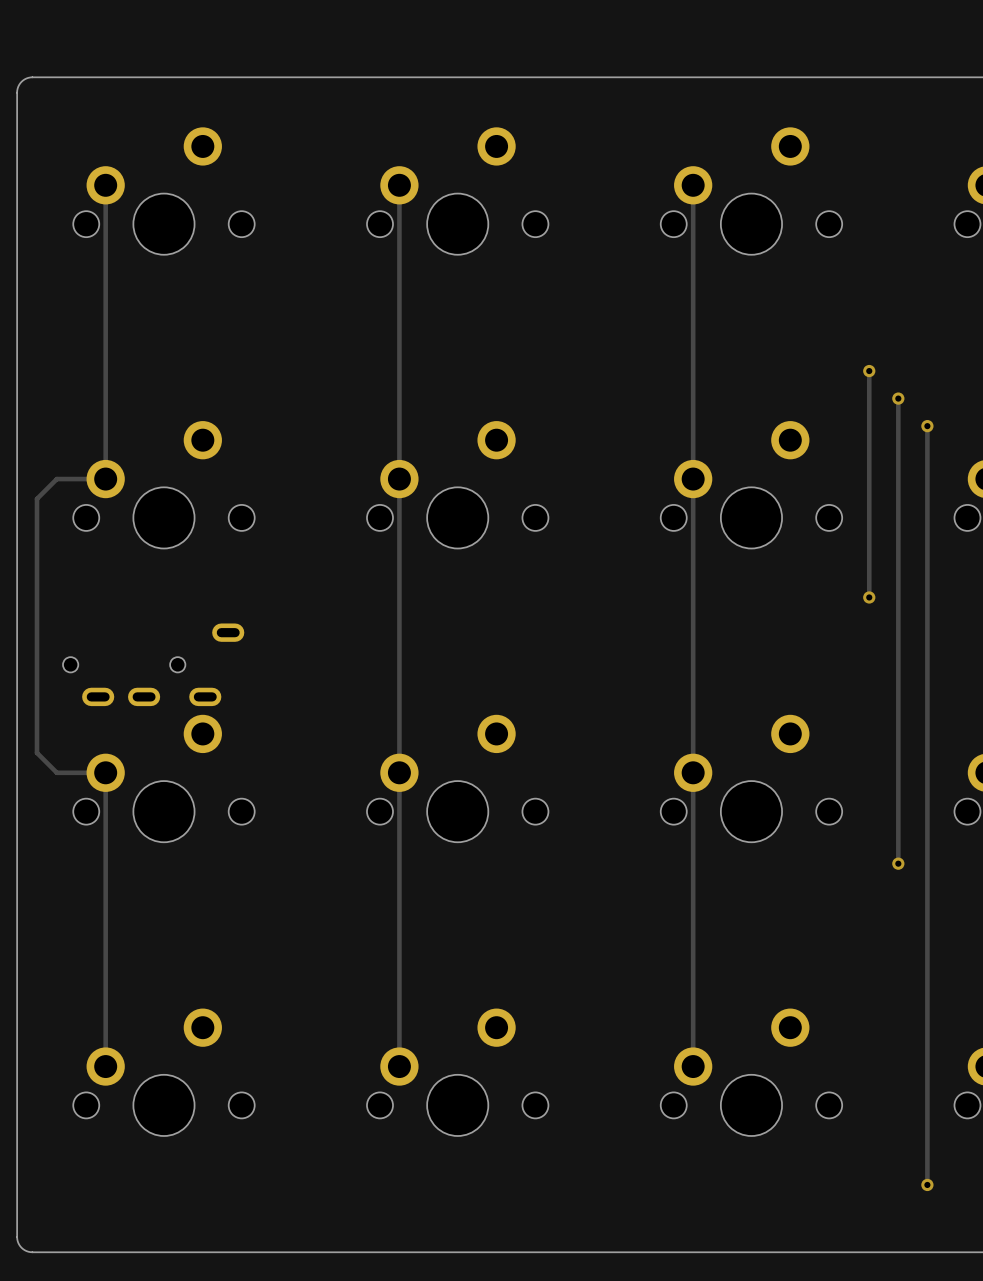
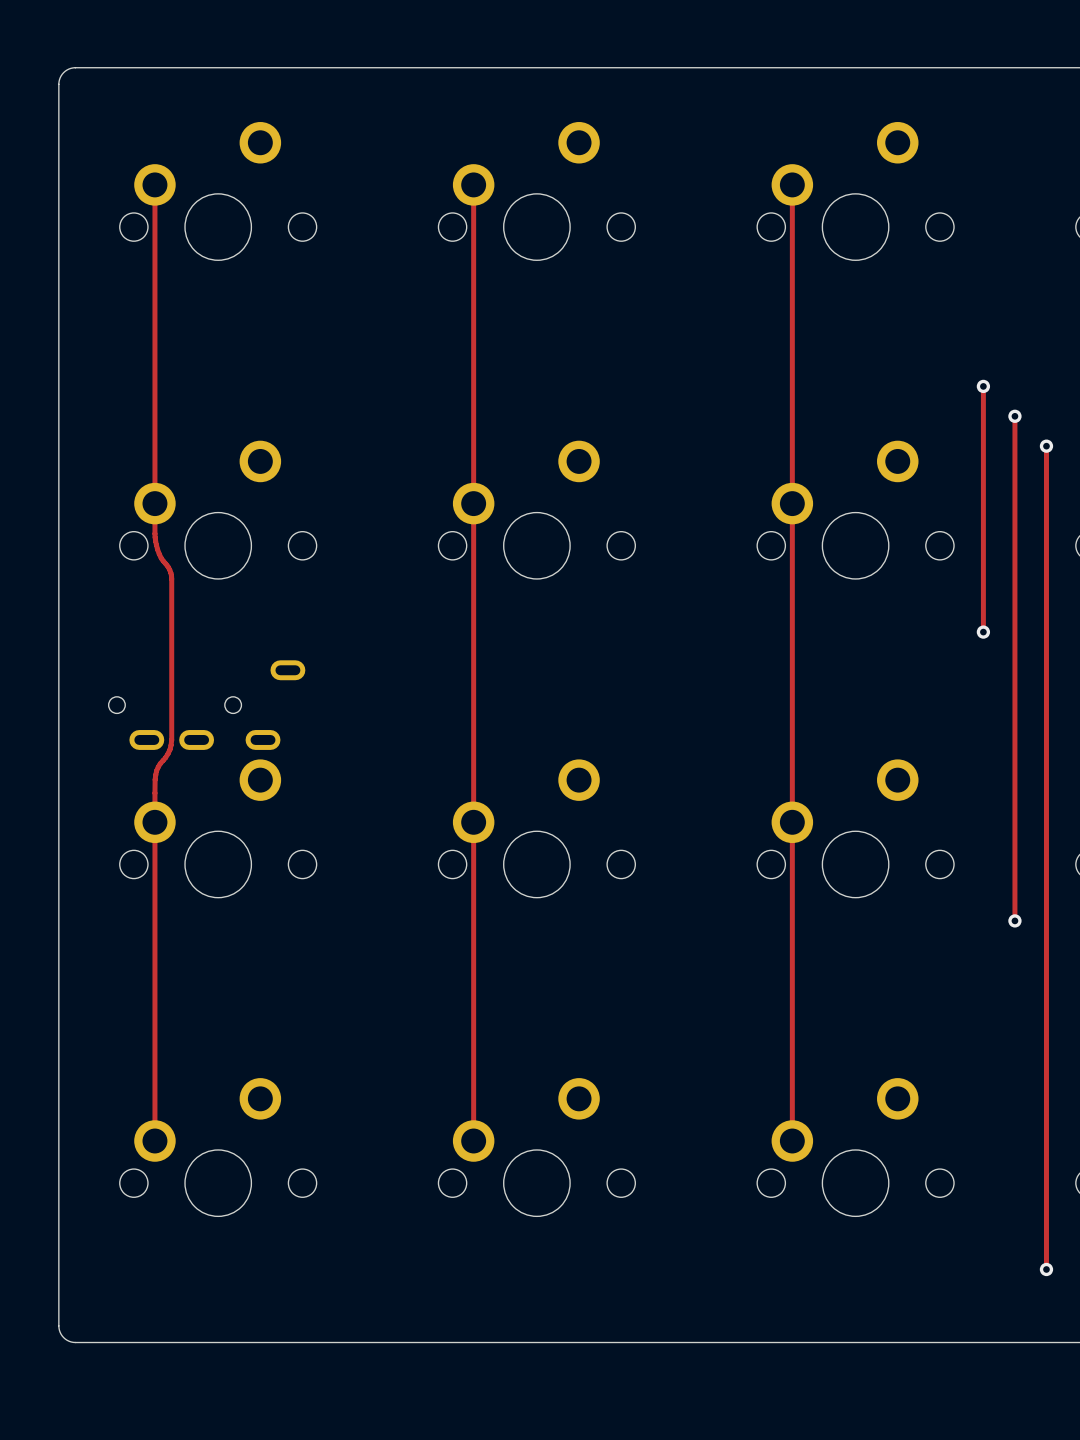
track: (105, 479) (56, 479) (36, 498) (36, 752) (56, 772) (105, 772) -> (154, 503) (156, 545) (161, 558) (169, 569) (171, 578) (171, 739) (170, 749) (158, 767) (155, 774) (154, 822)

